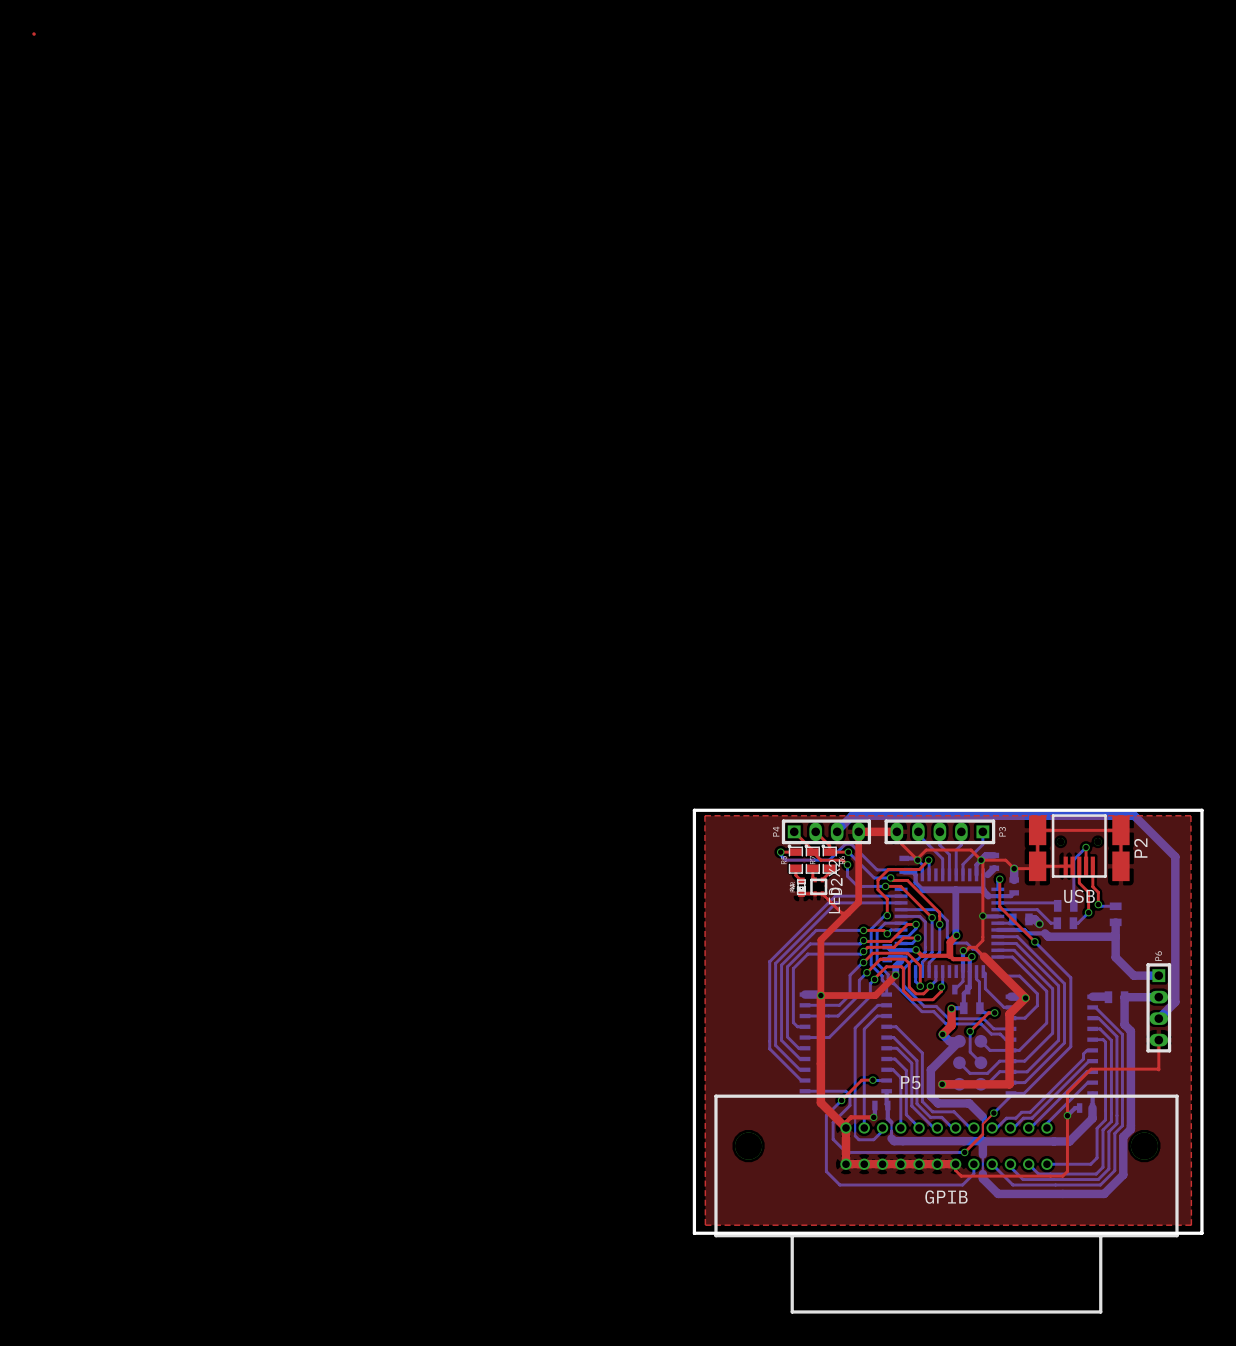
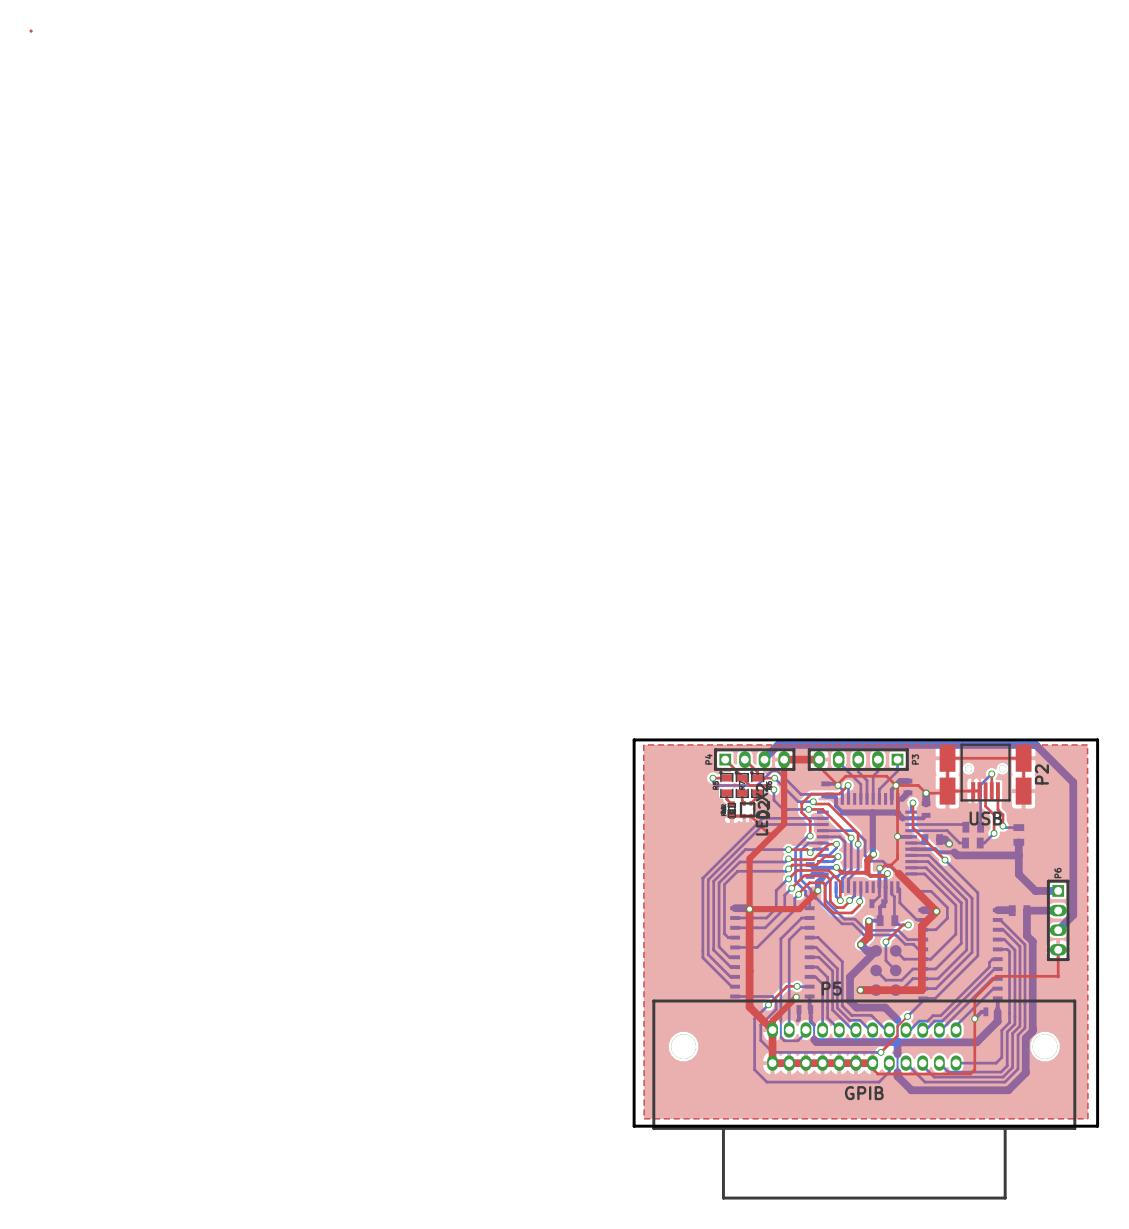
P5 footprint: [714, 1094, 1179, 1314] -> [652, 999, 1077, 1200]
top track: (873, 1117) (850, 1117) (846, 1122) -> (796, 997) (772, 1020) (772, 1024)
via position: (873, 1117) -> (796, 997)

